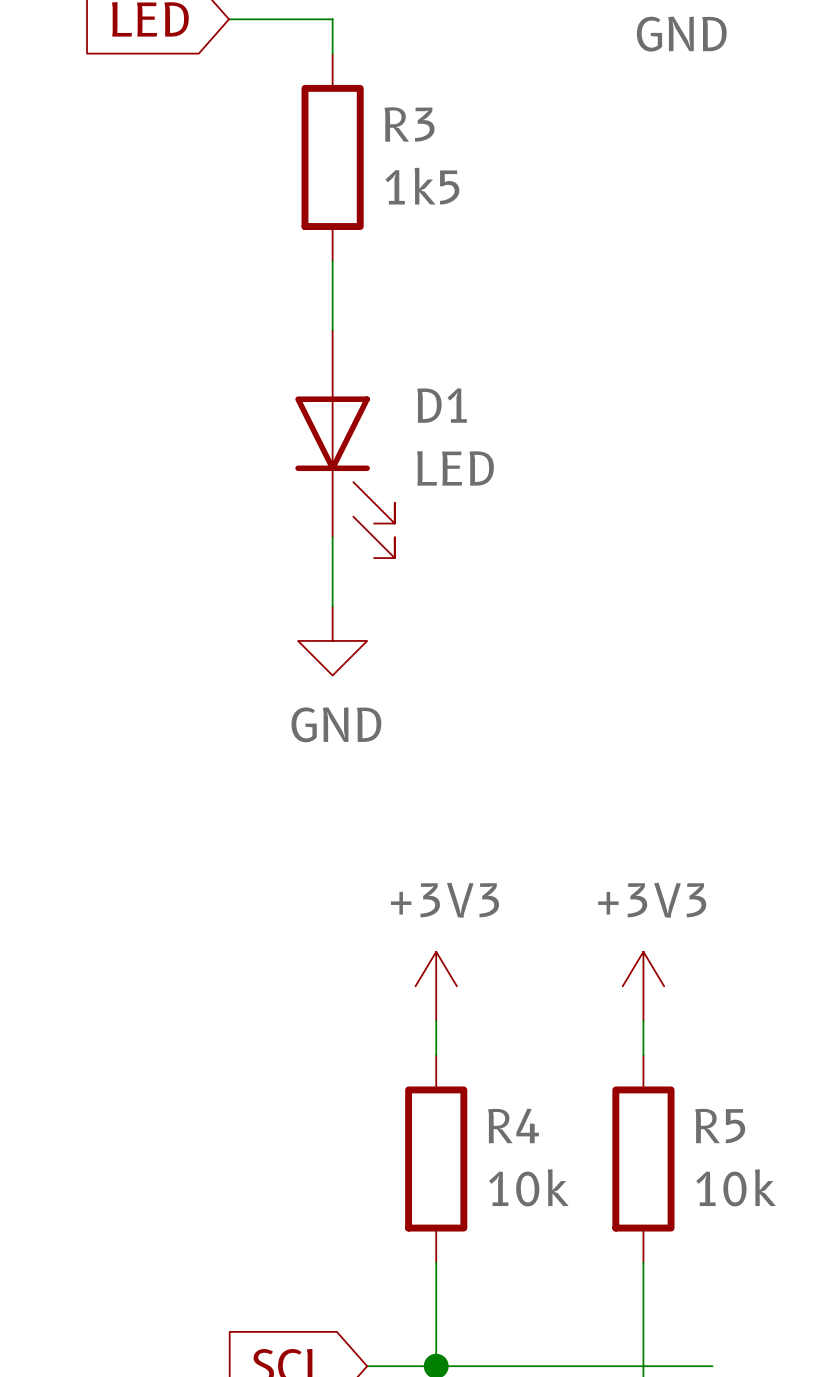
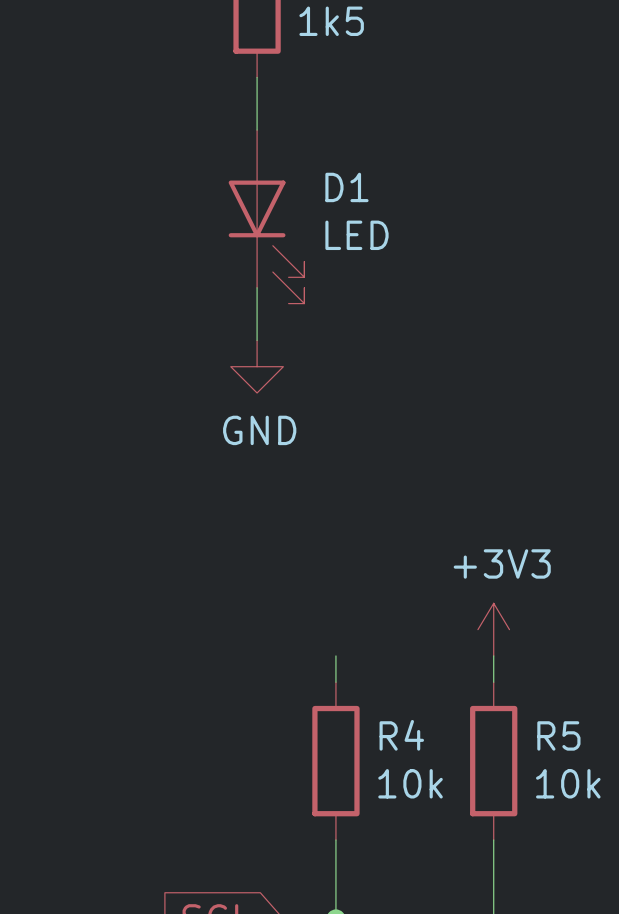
power symbol: +3V3 (436, 986) -> none

